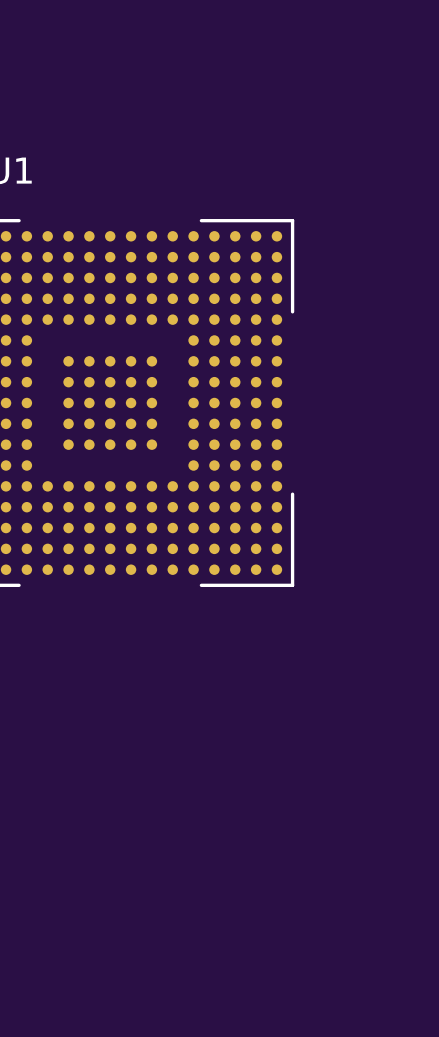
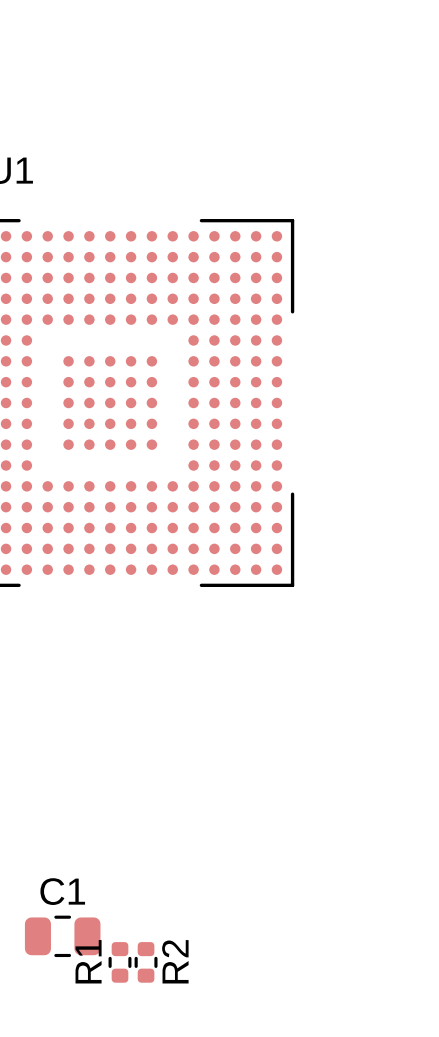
C1: none -> (62, 936)
R1: none -> (120, 962)
R2: none -> (146, 962)

